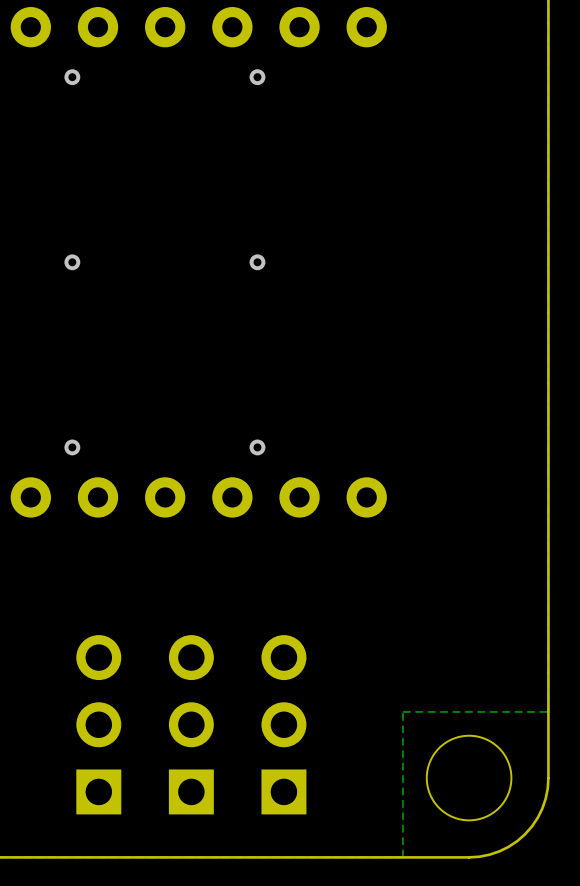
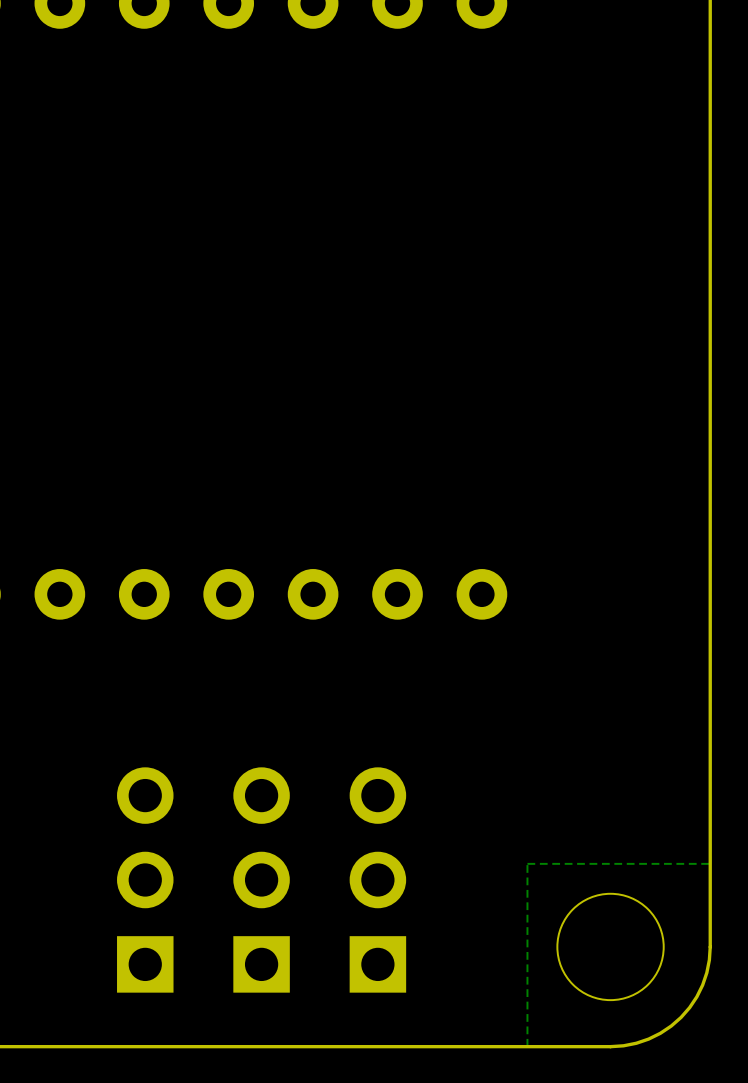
via: (72, 77) -> none
via: (257, 77) -> none
via: (72, 262) -> none
via: (257, 262) -> none
via: (72, 447) -> none
via: (257, 447) -> none

